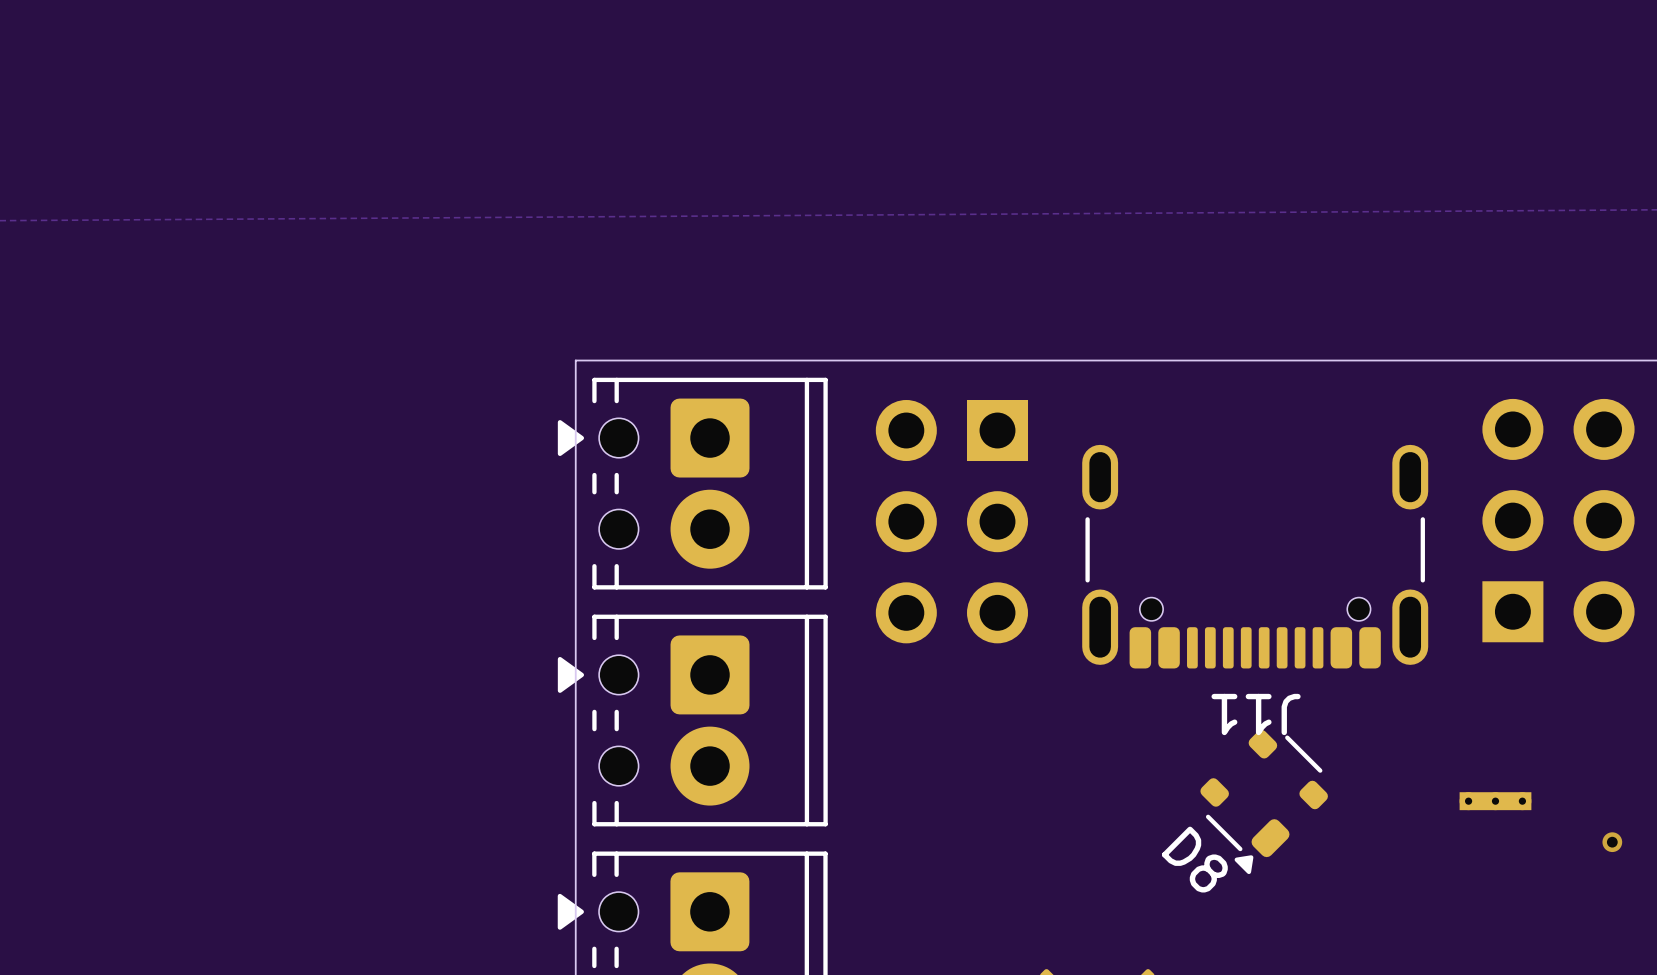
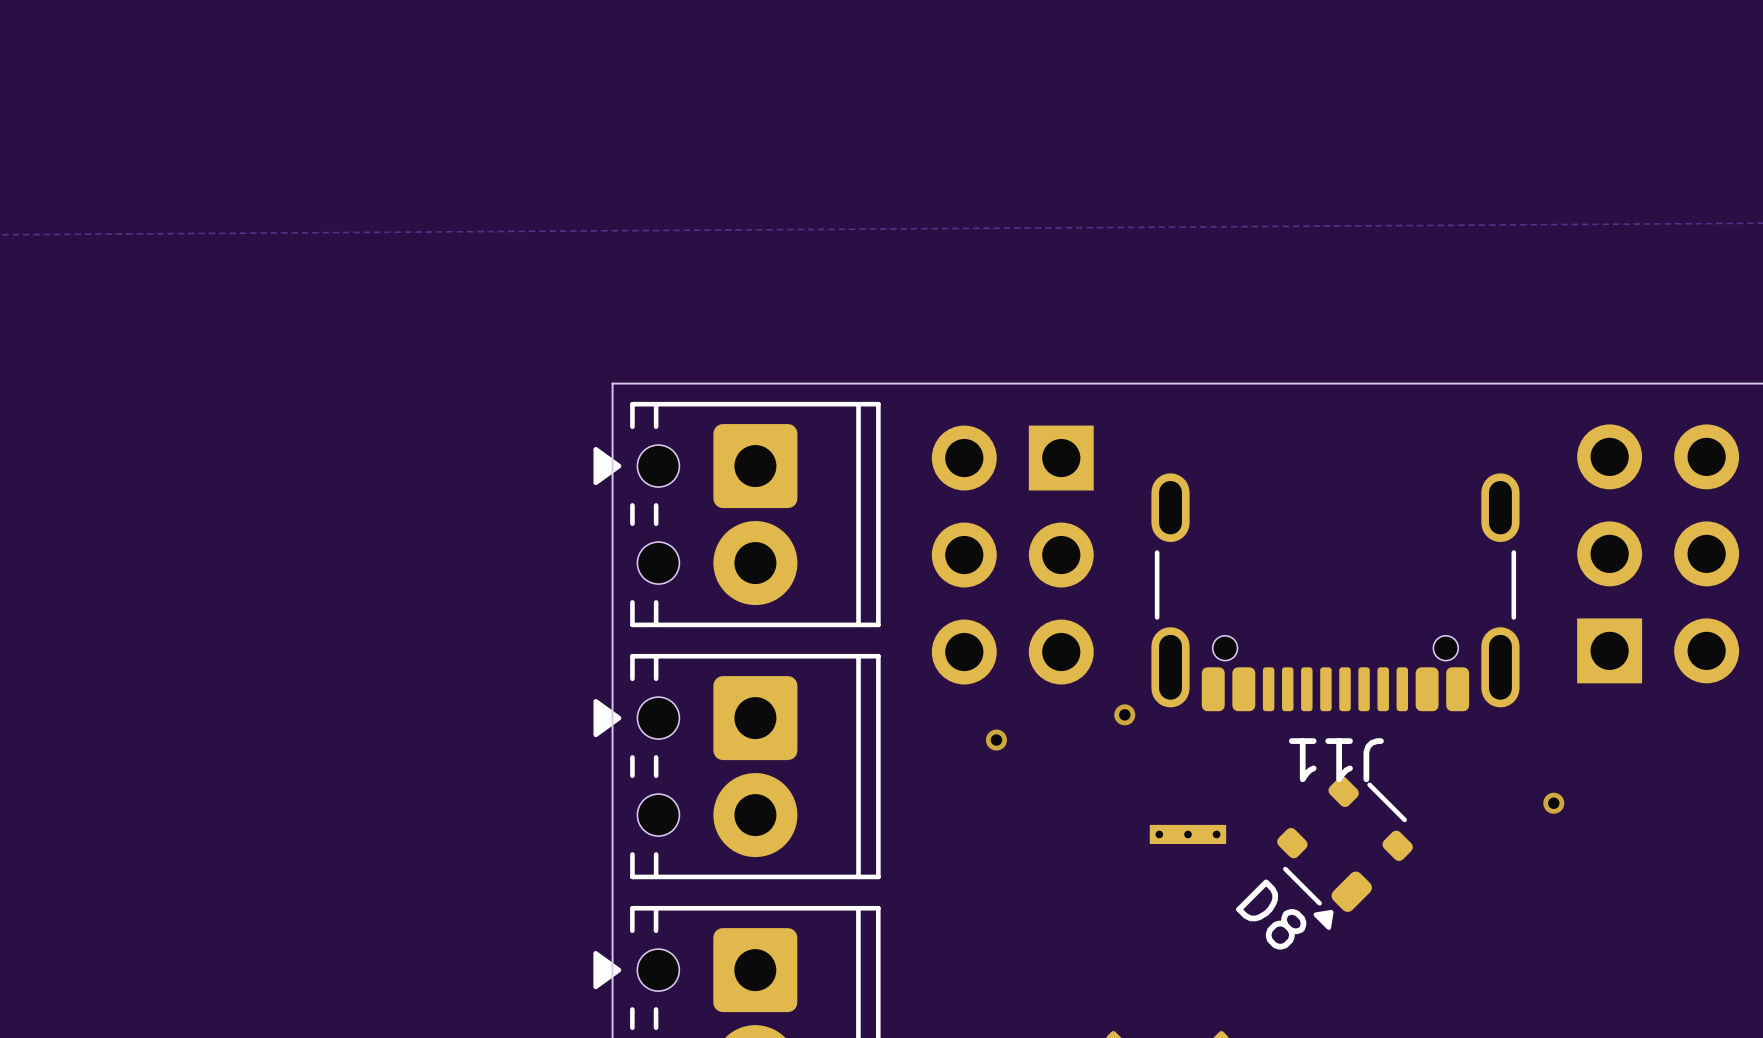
via: none -> (1124, 714)
via: none -> (996, 740)
via: none -> (1553, 803)
part position: (1495, 801) -> (1187, 834)
via: (1612, 842) -> none

